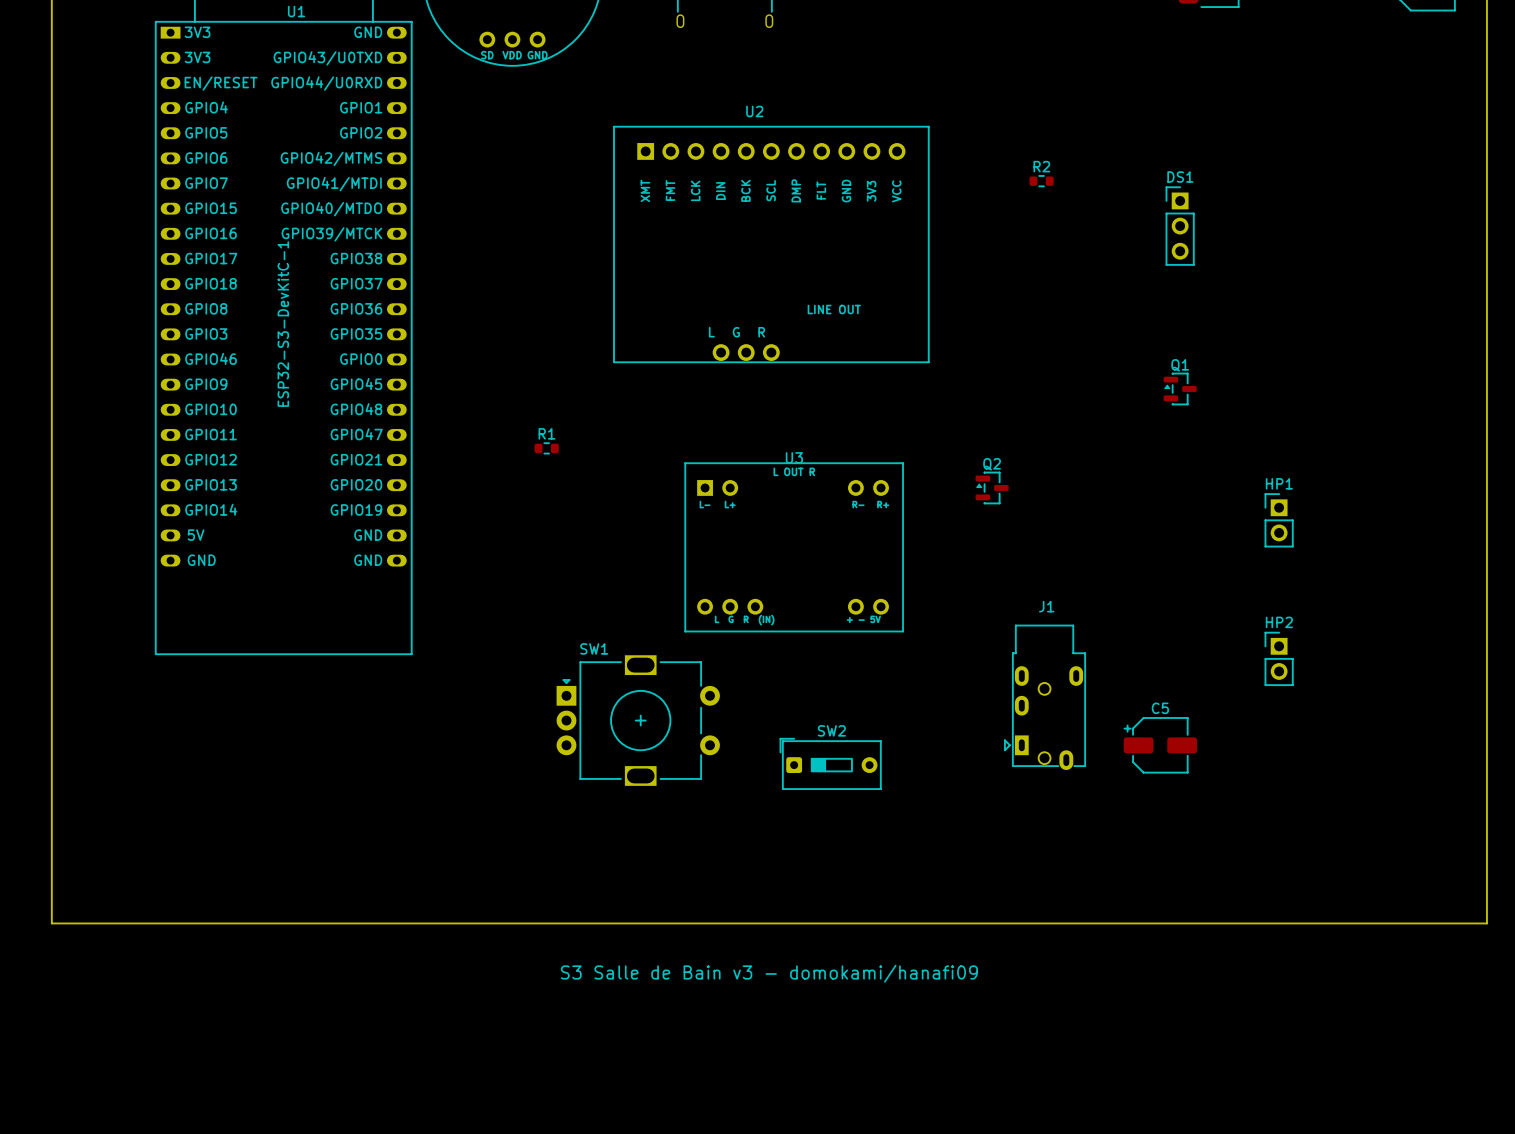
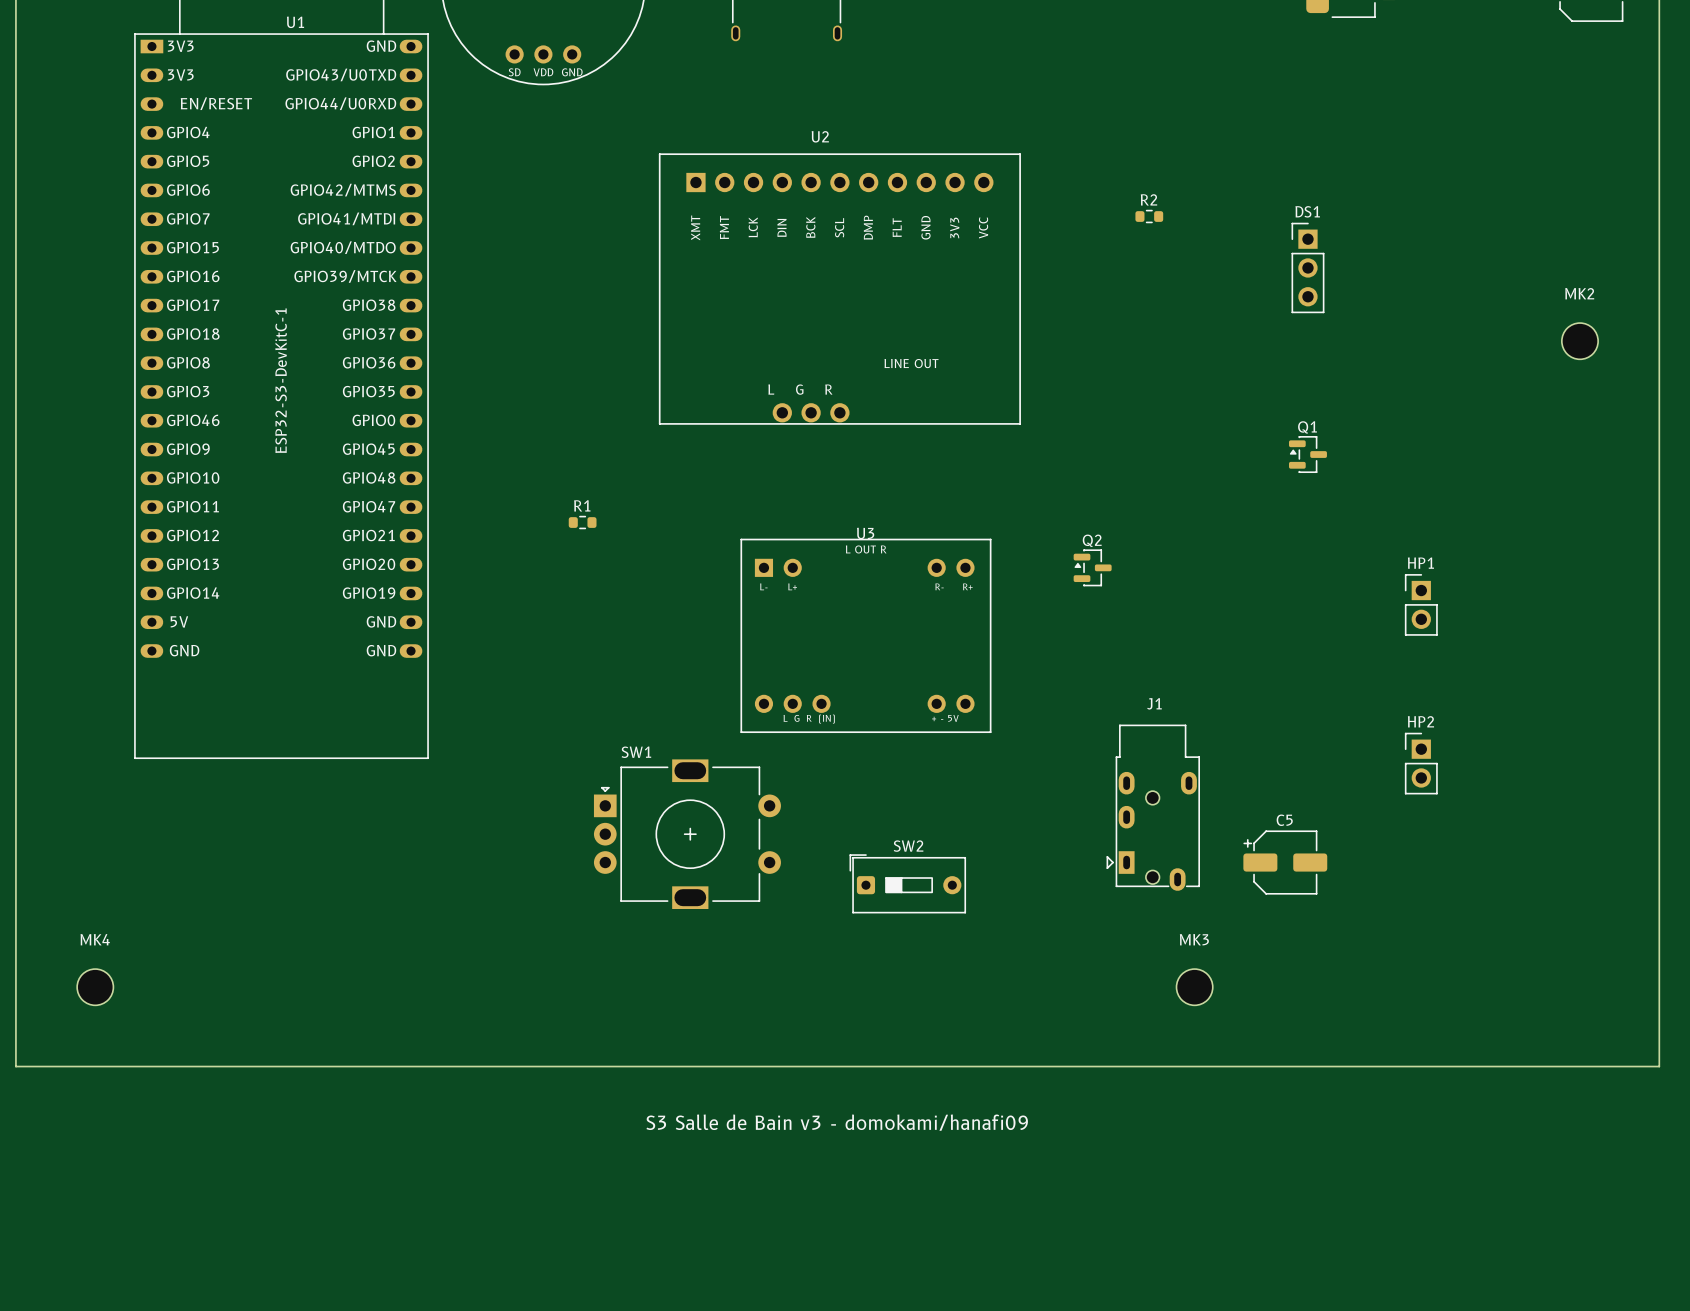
MK2: none -> (1579, 341)
MK4: none -> (95, 987)
MK3: none -> (1194, 987)

